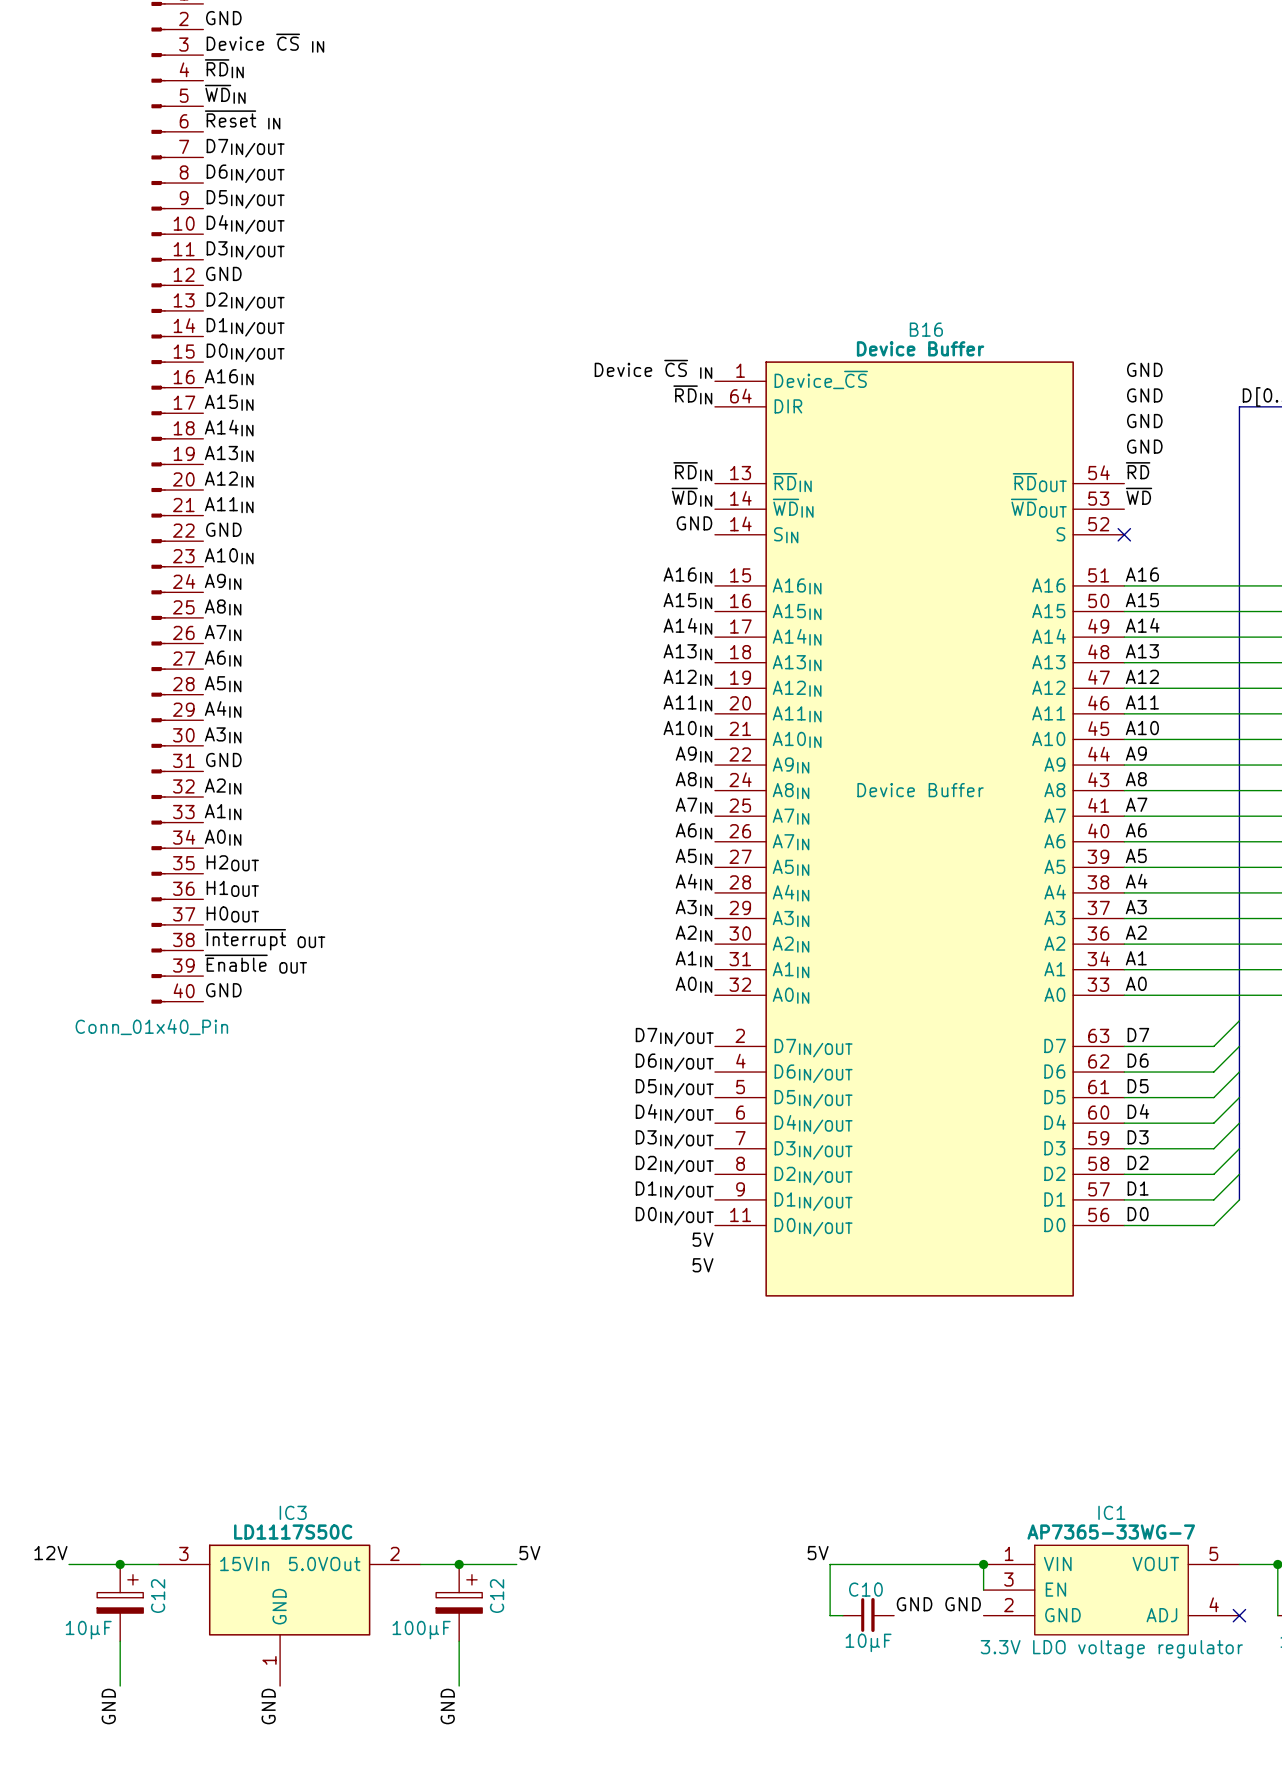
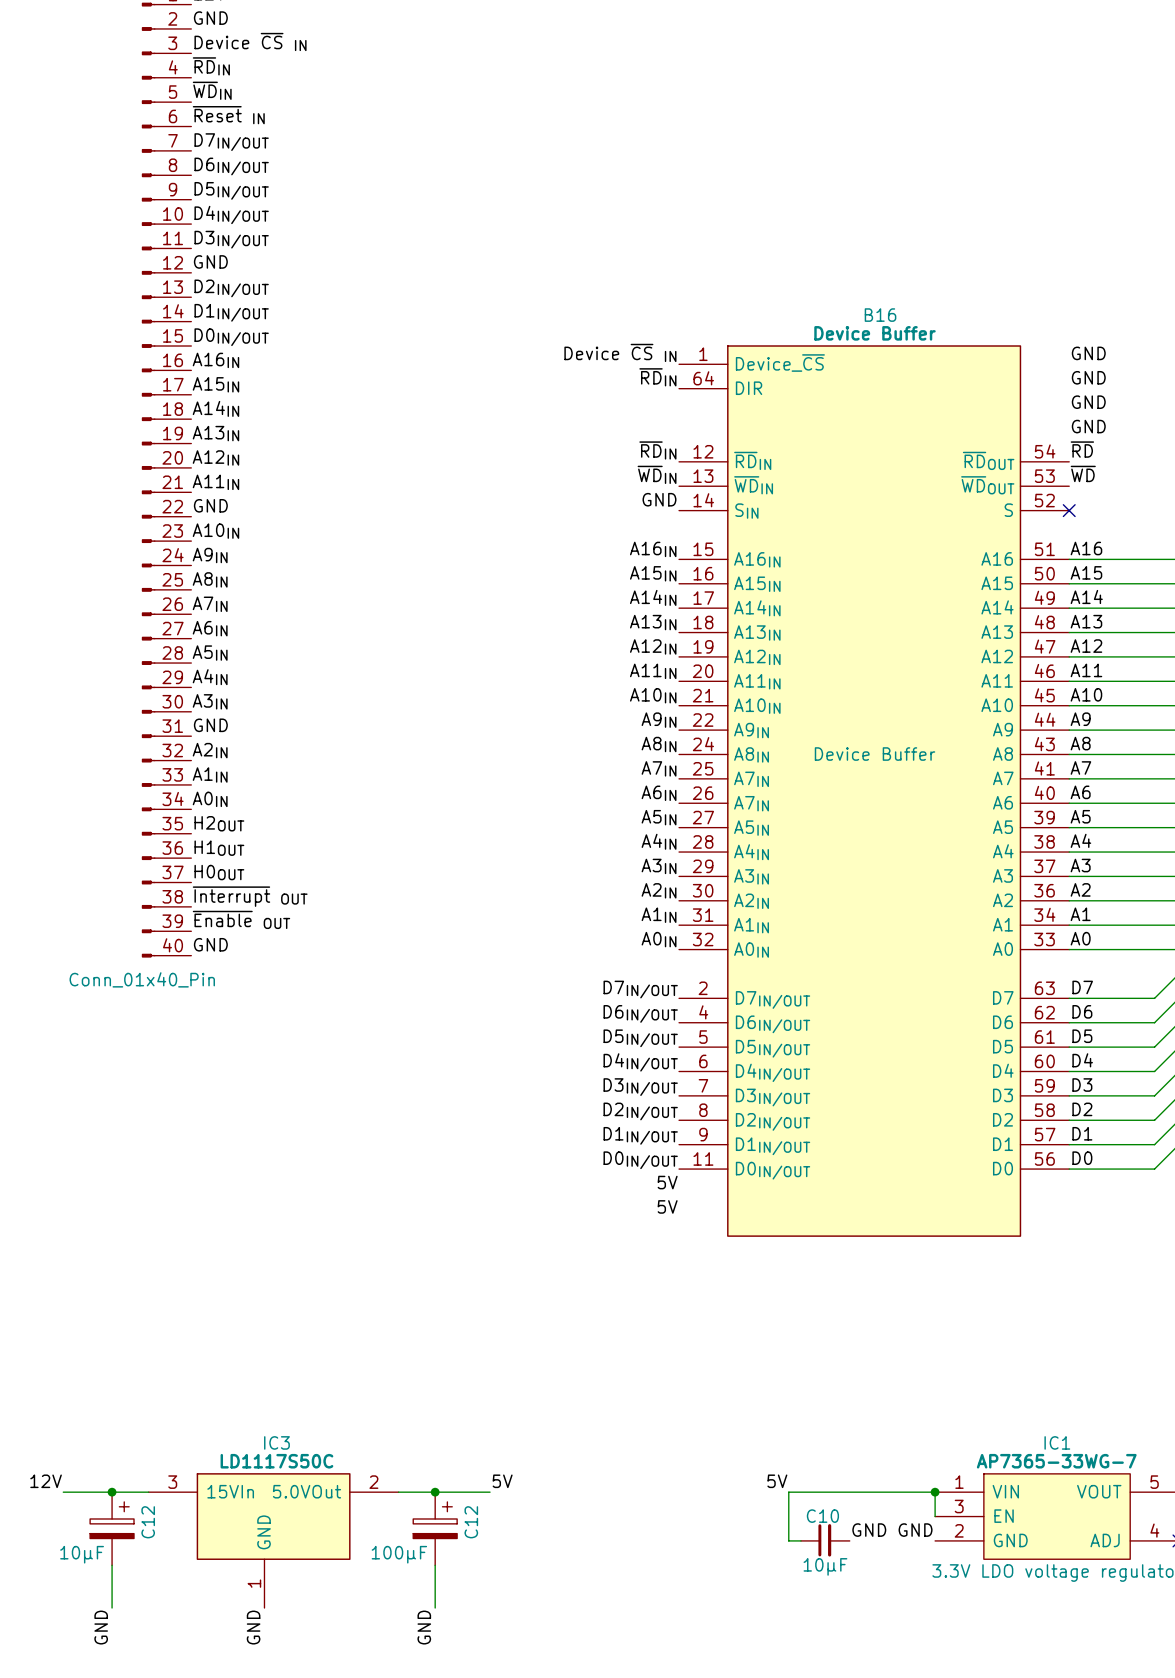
B16 pin number: 13 (740, 473) -> 12 (703, 451)
B16 pin number: 14 (740, 498) -> 13 (703, 476)

